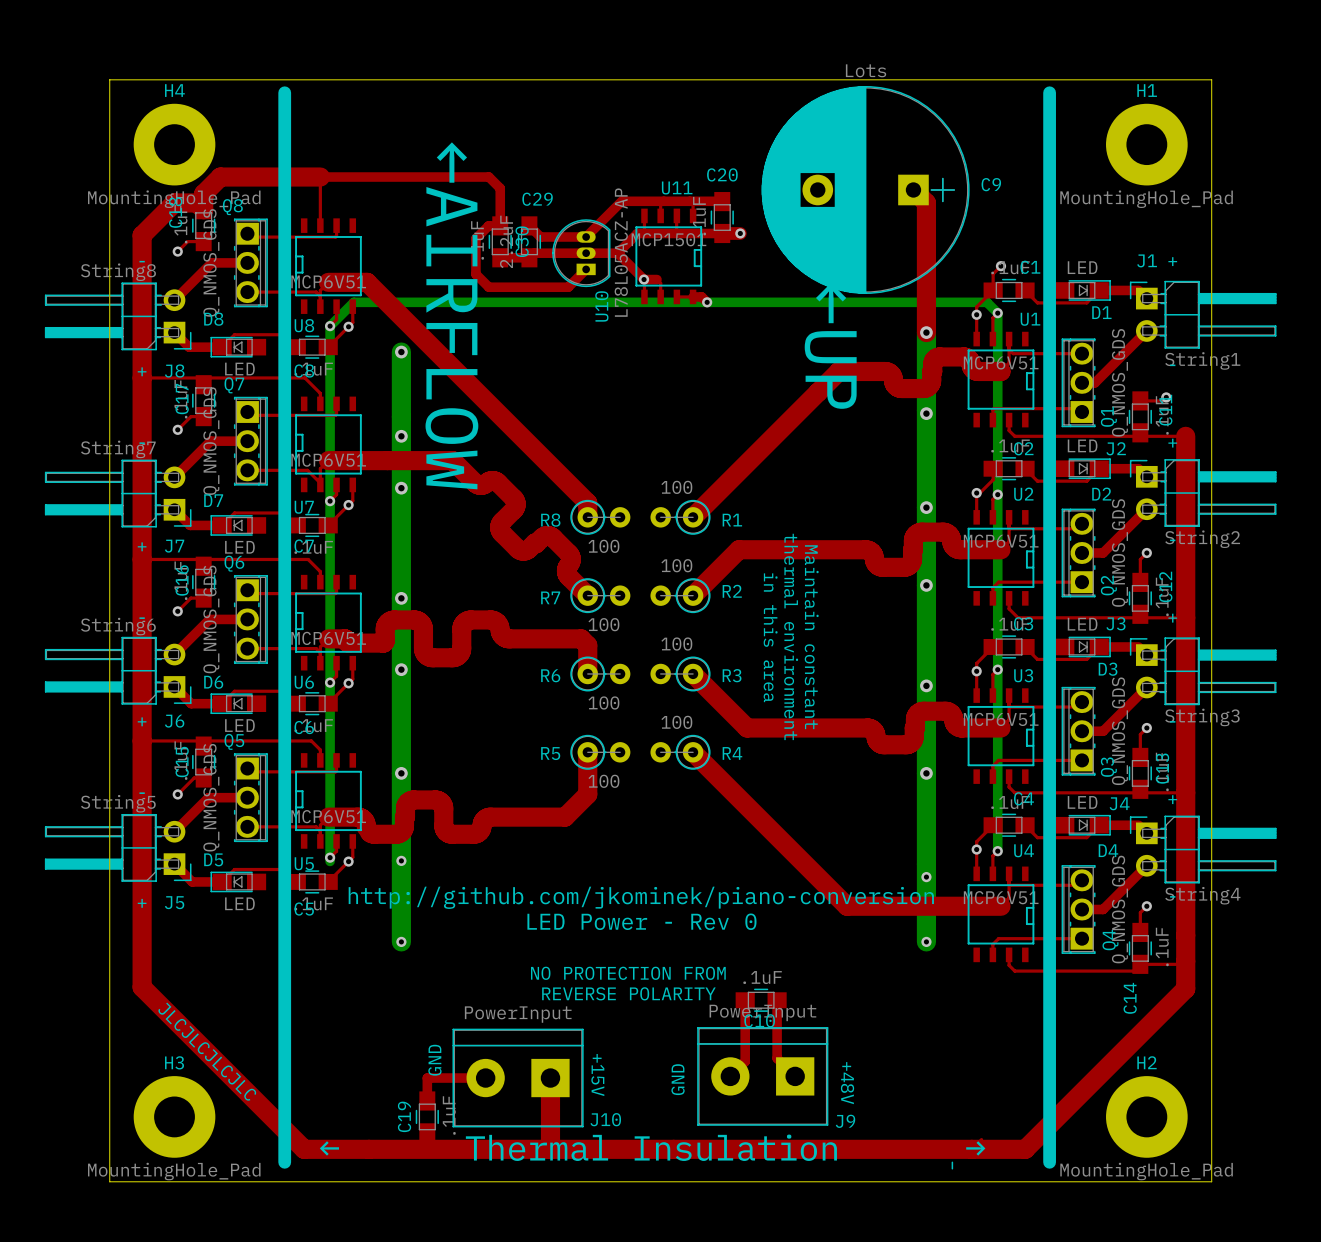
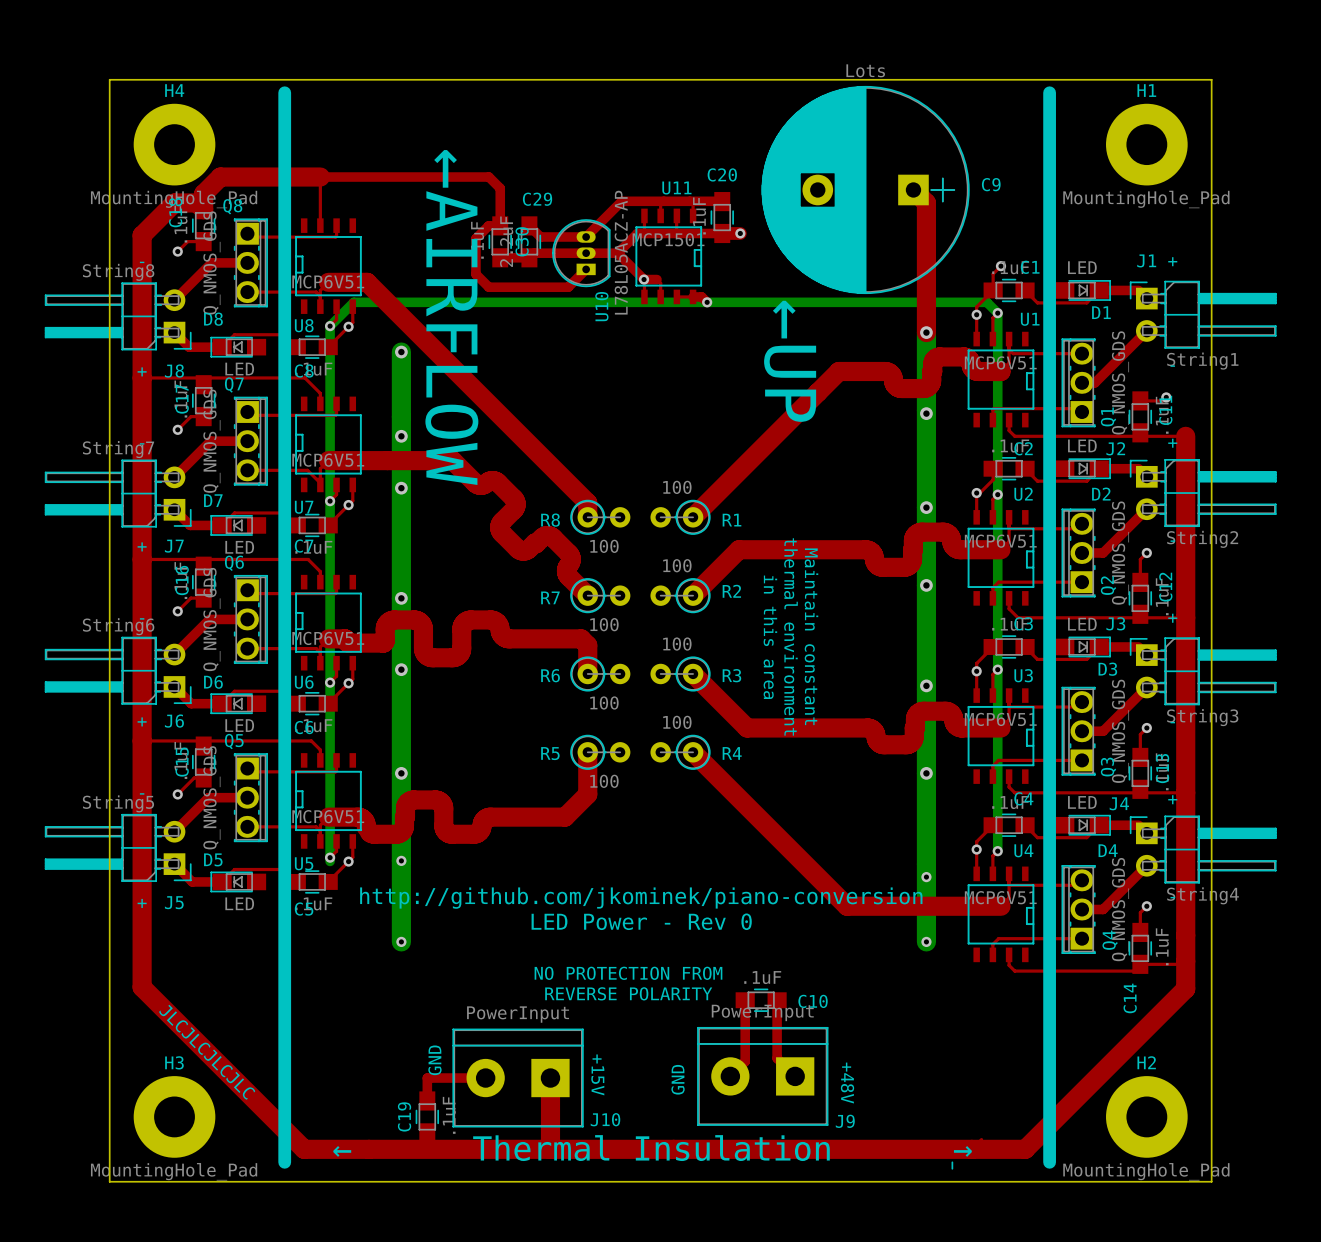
text position: ←UP (830, 345) -> ←UP (790, 361)
C10 name position: C10 (759, 1020) -> C10 (813, 1001)

